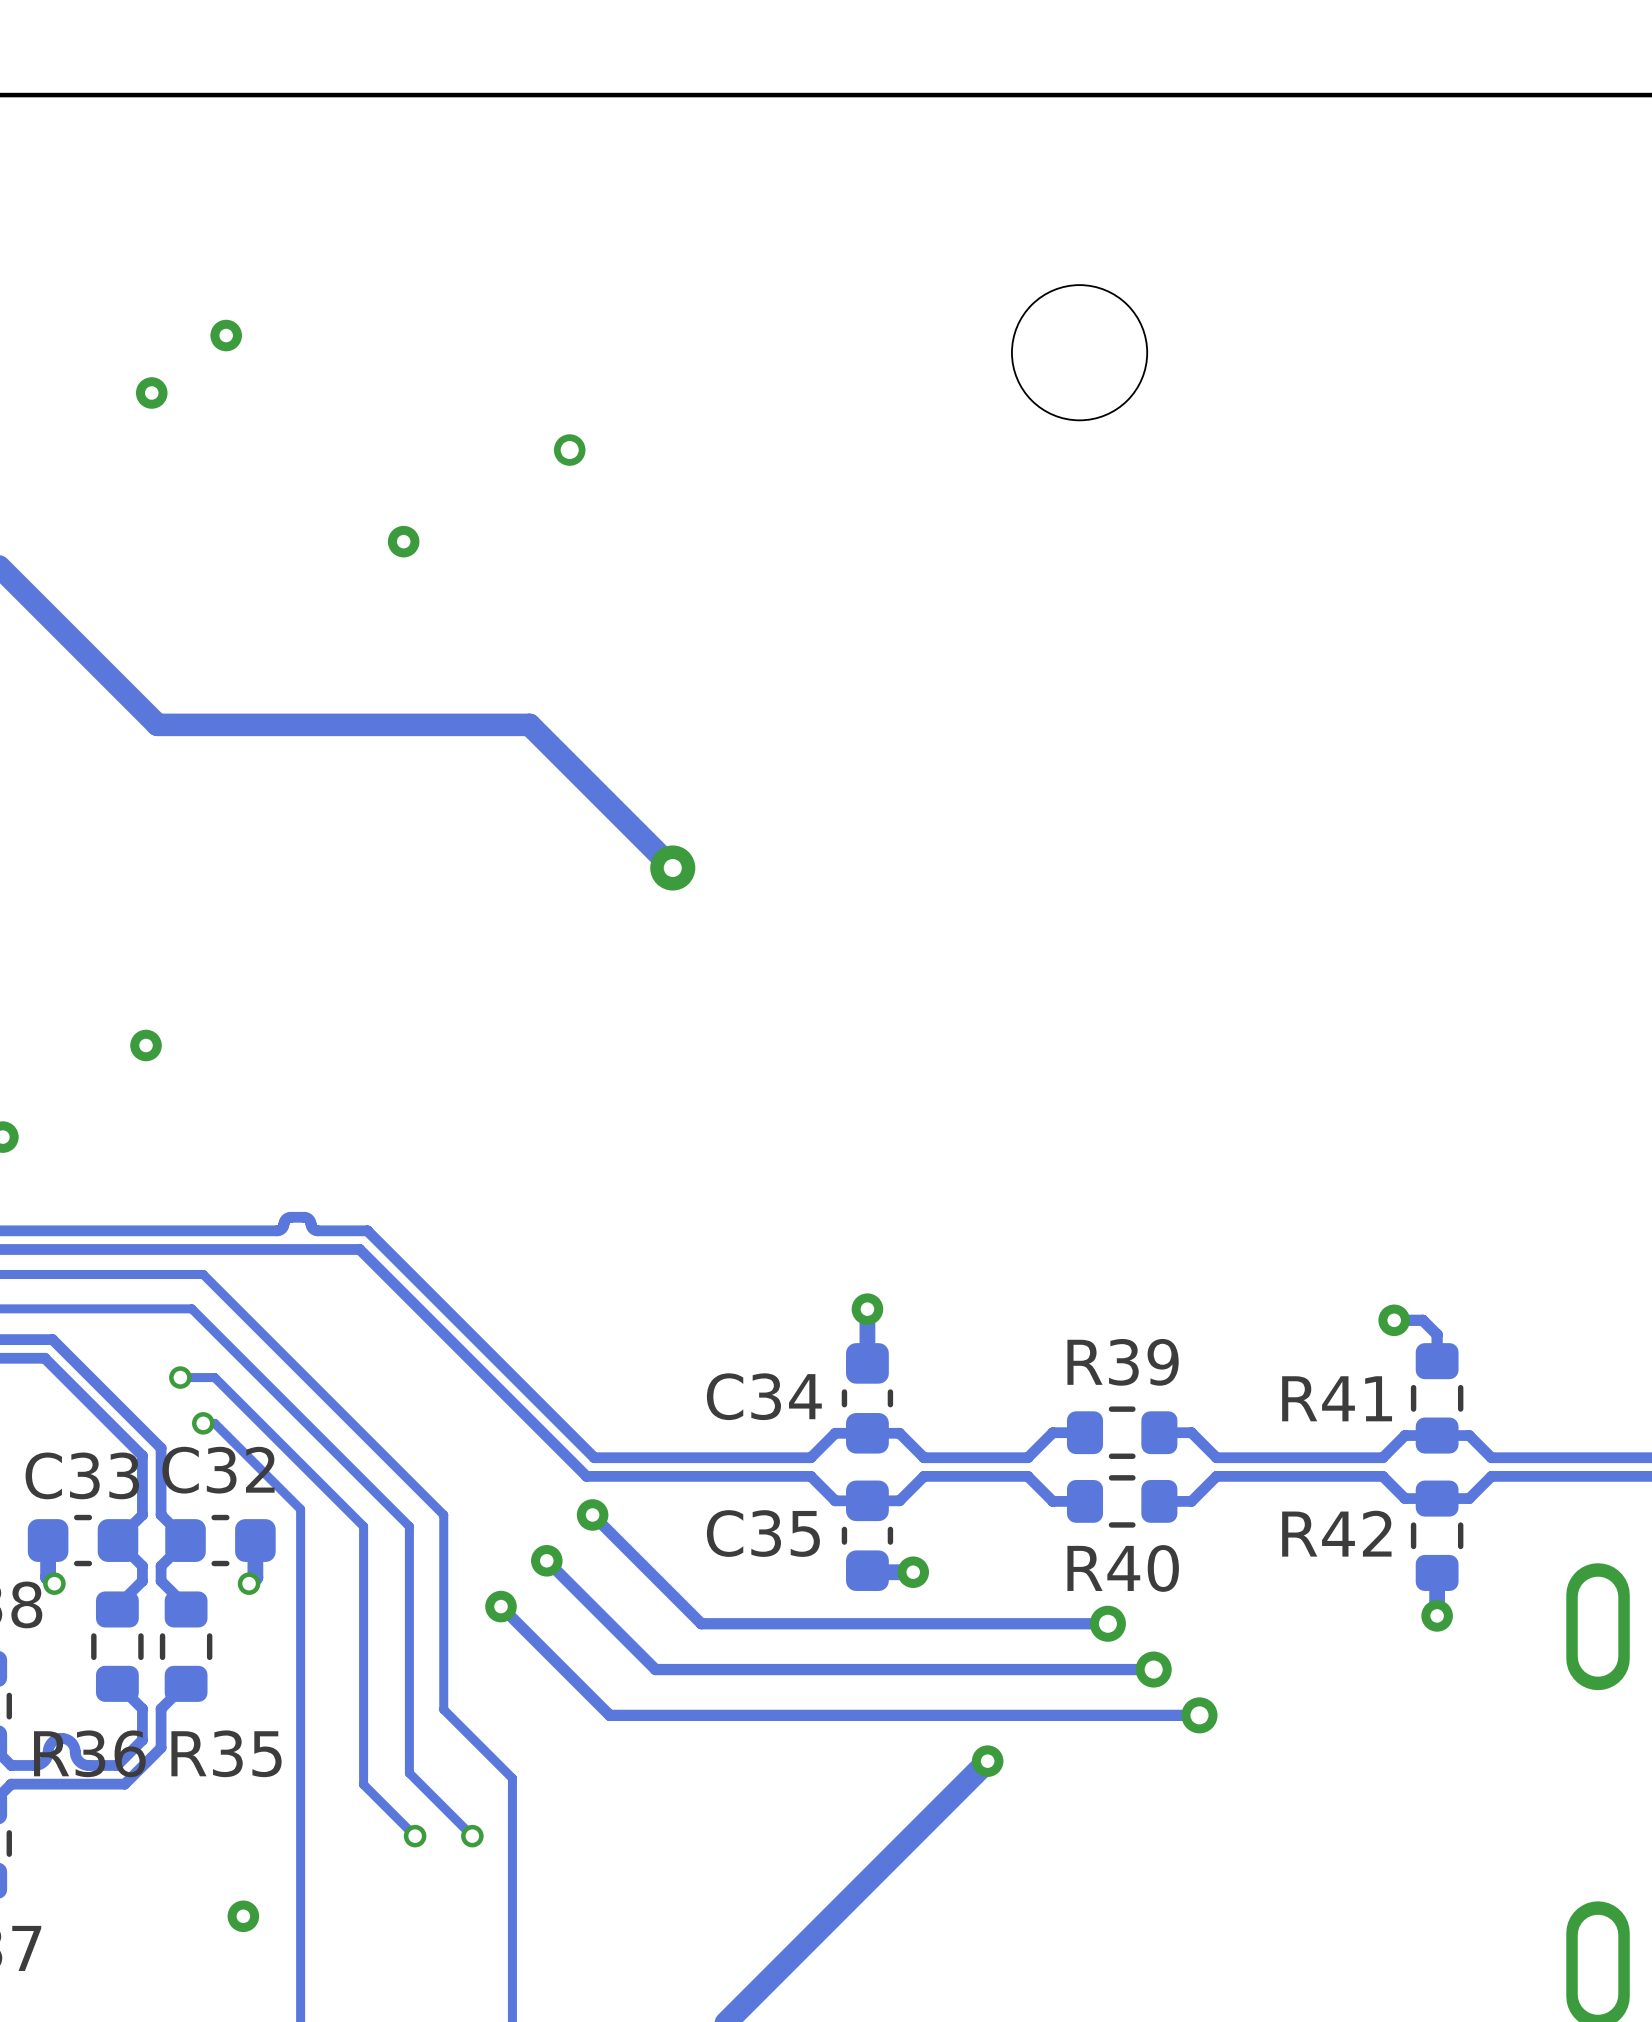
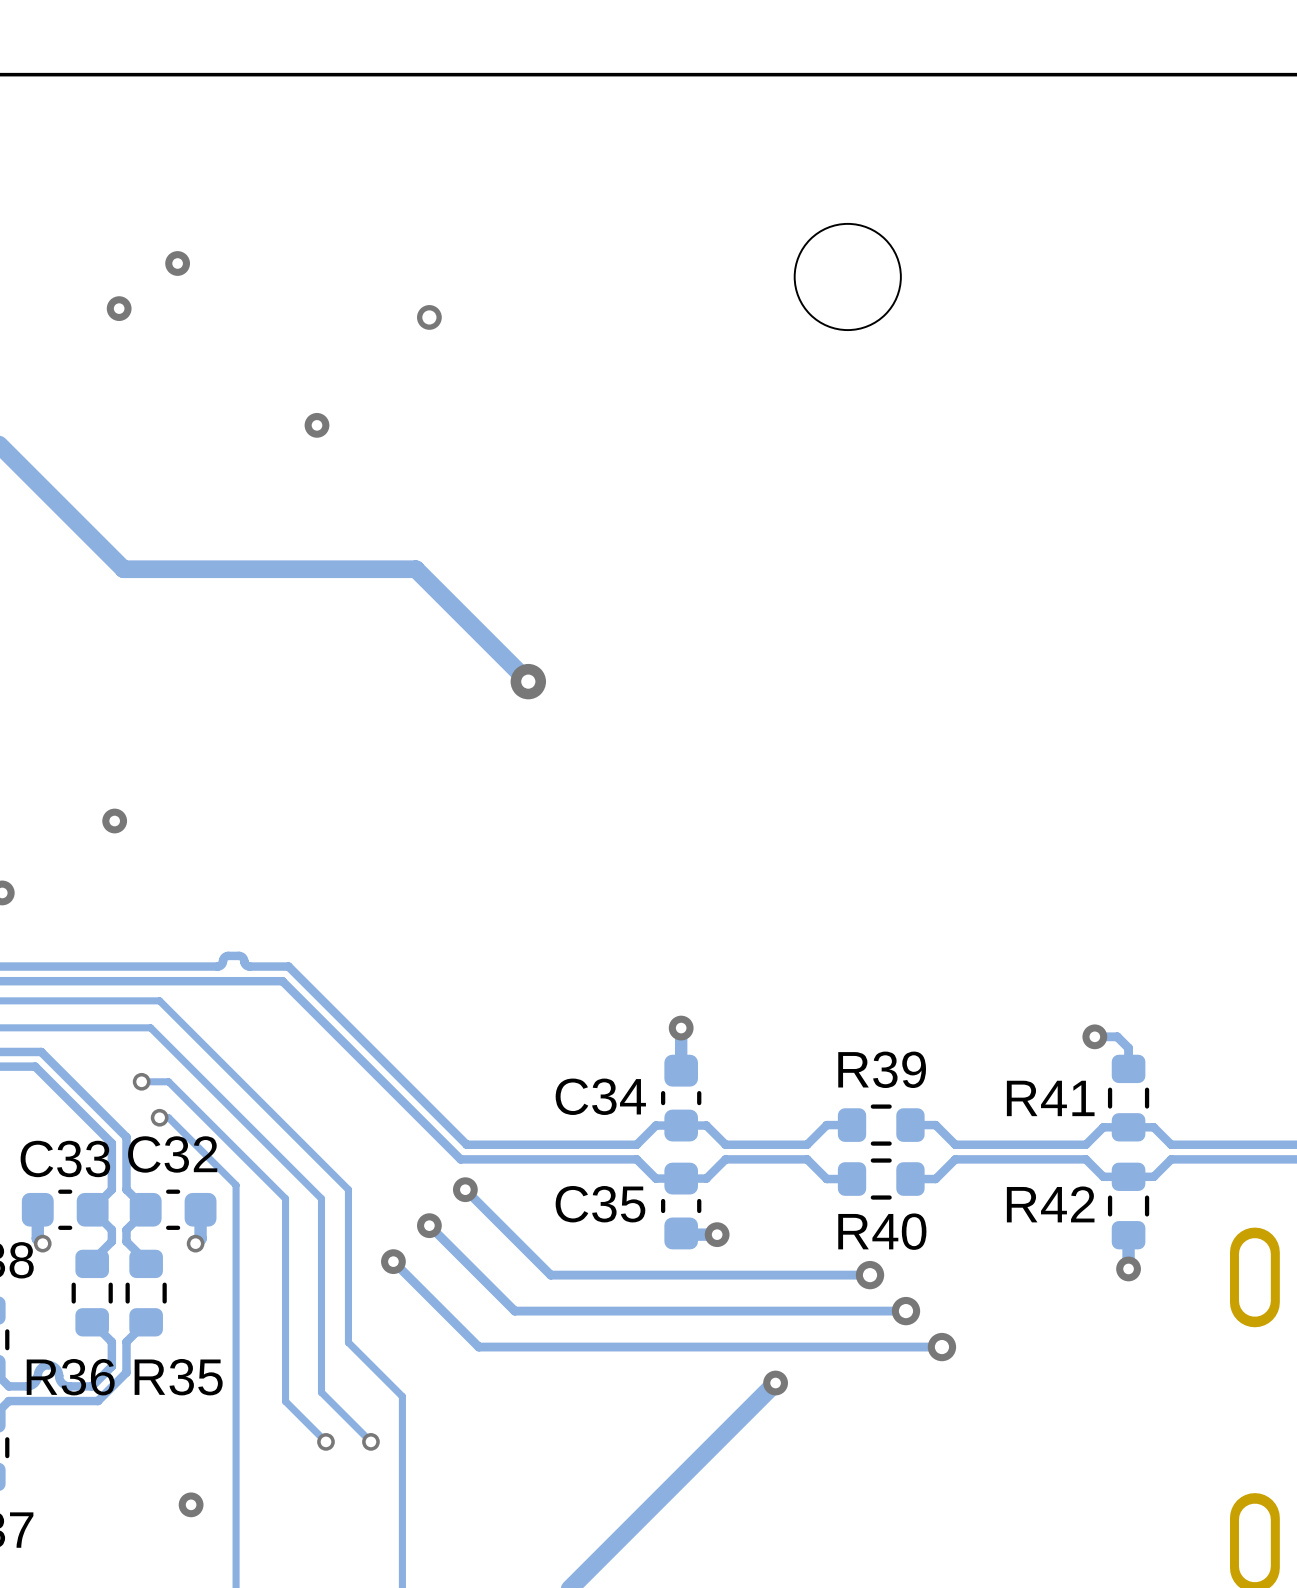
via position: (569, 450) -> (429, 317)

